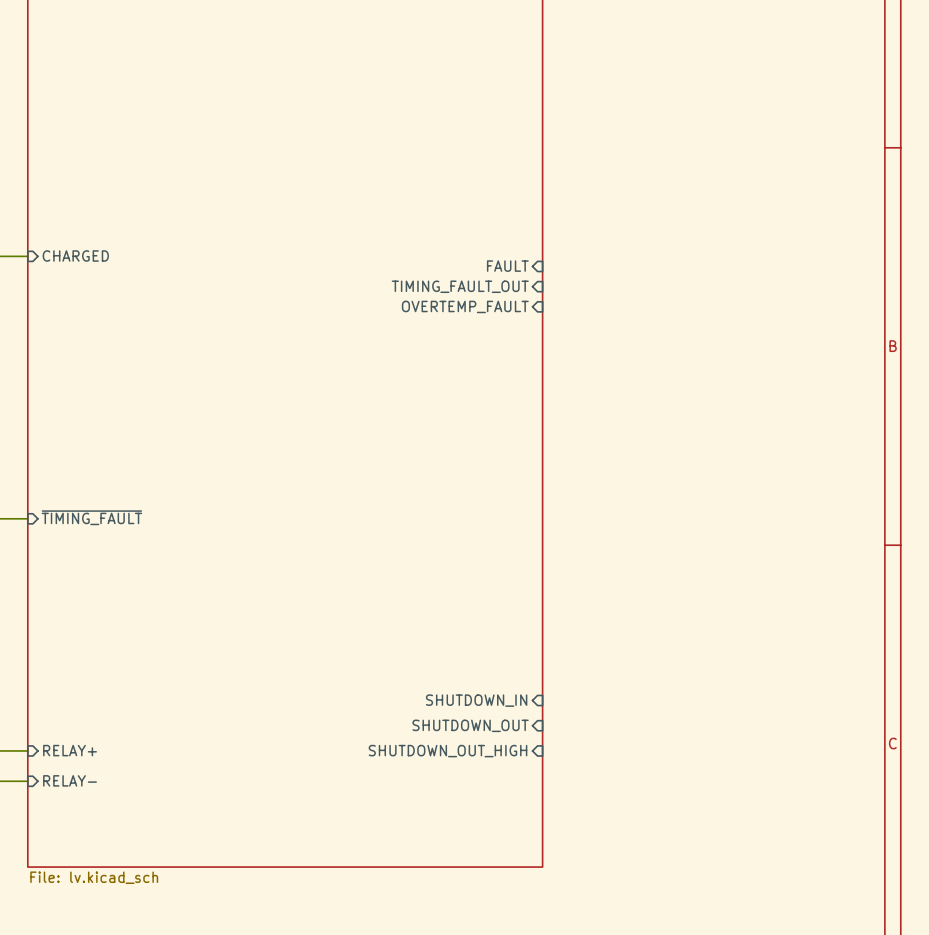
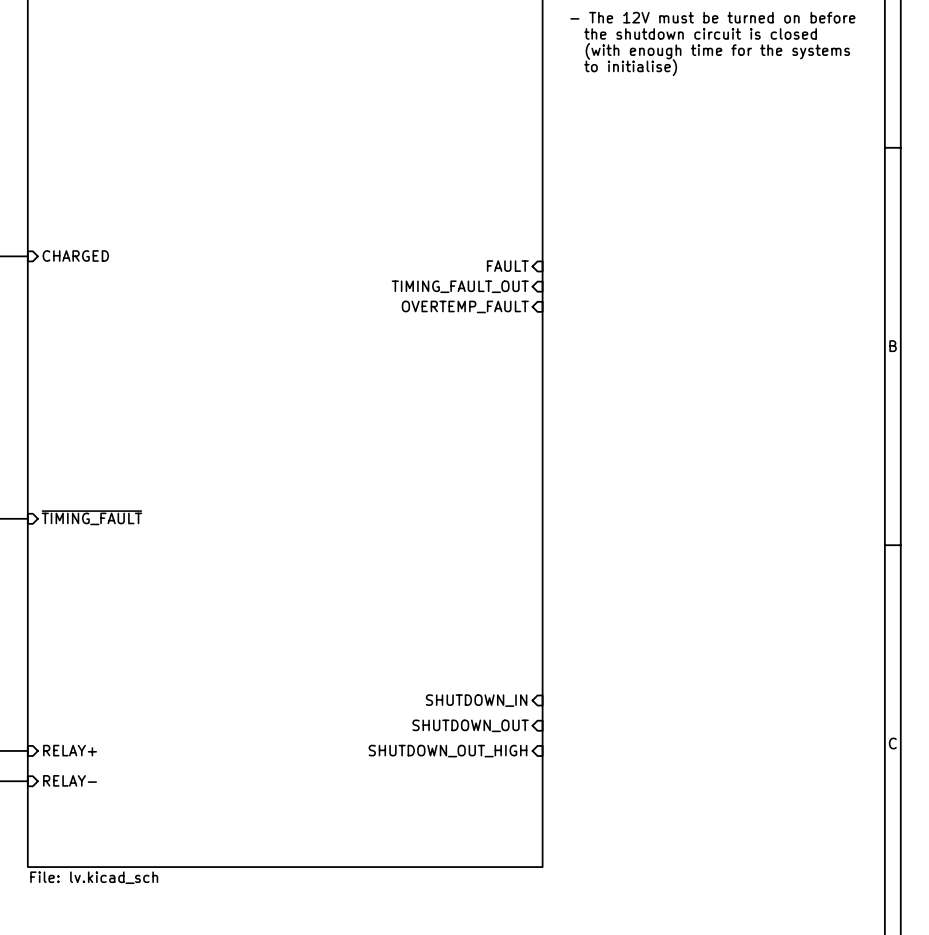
text: none -> - The 12V must be turned on before (712, 17)
text: none -> the shutdown circuit is closed (700, 33)
text: none -> (with enough time for the systems (717, 51)
text: none -> to initialise) (630, 67)

